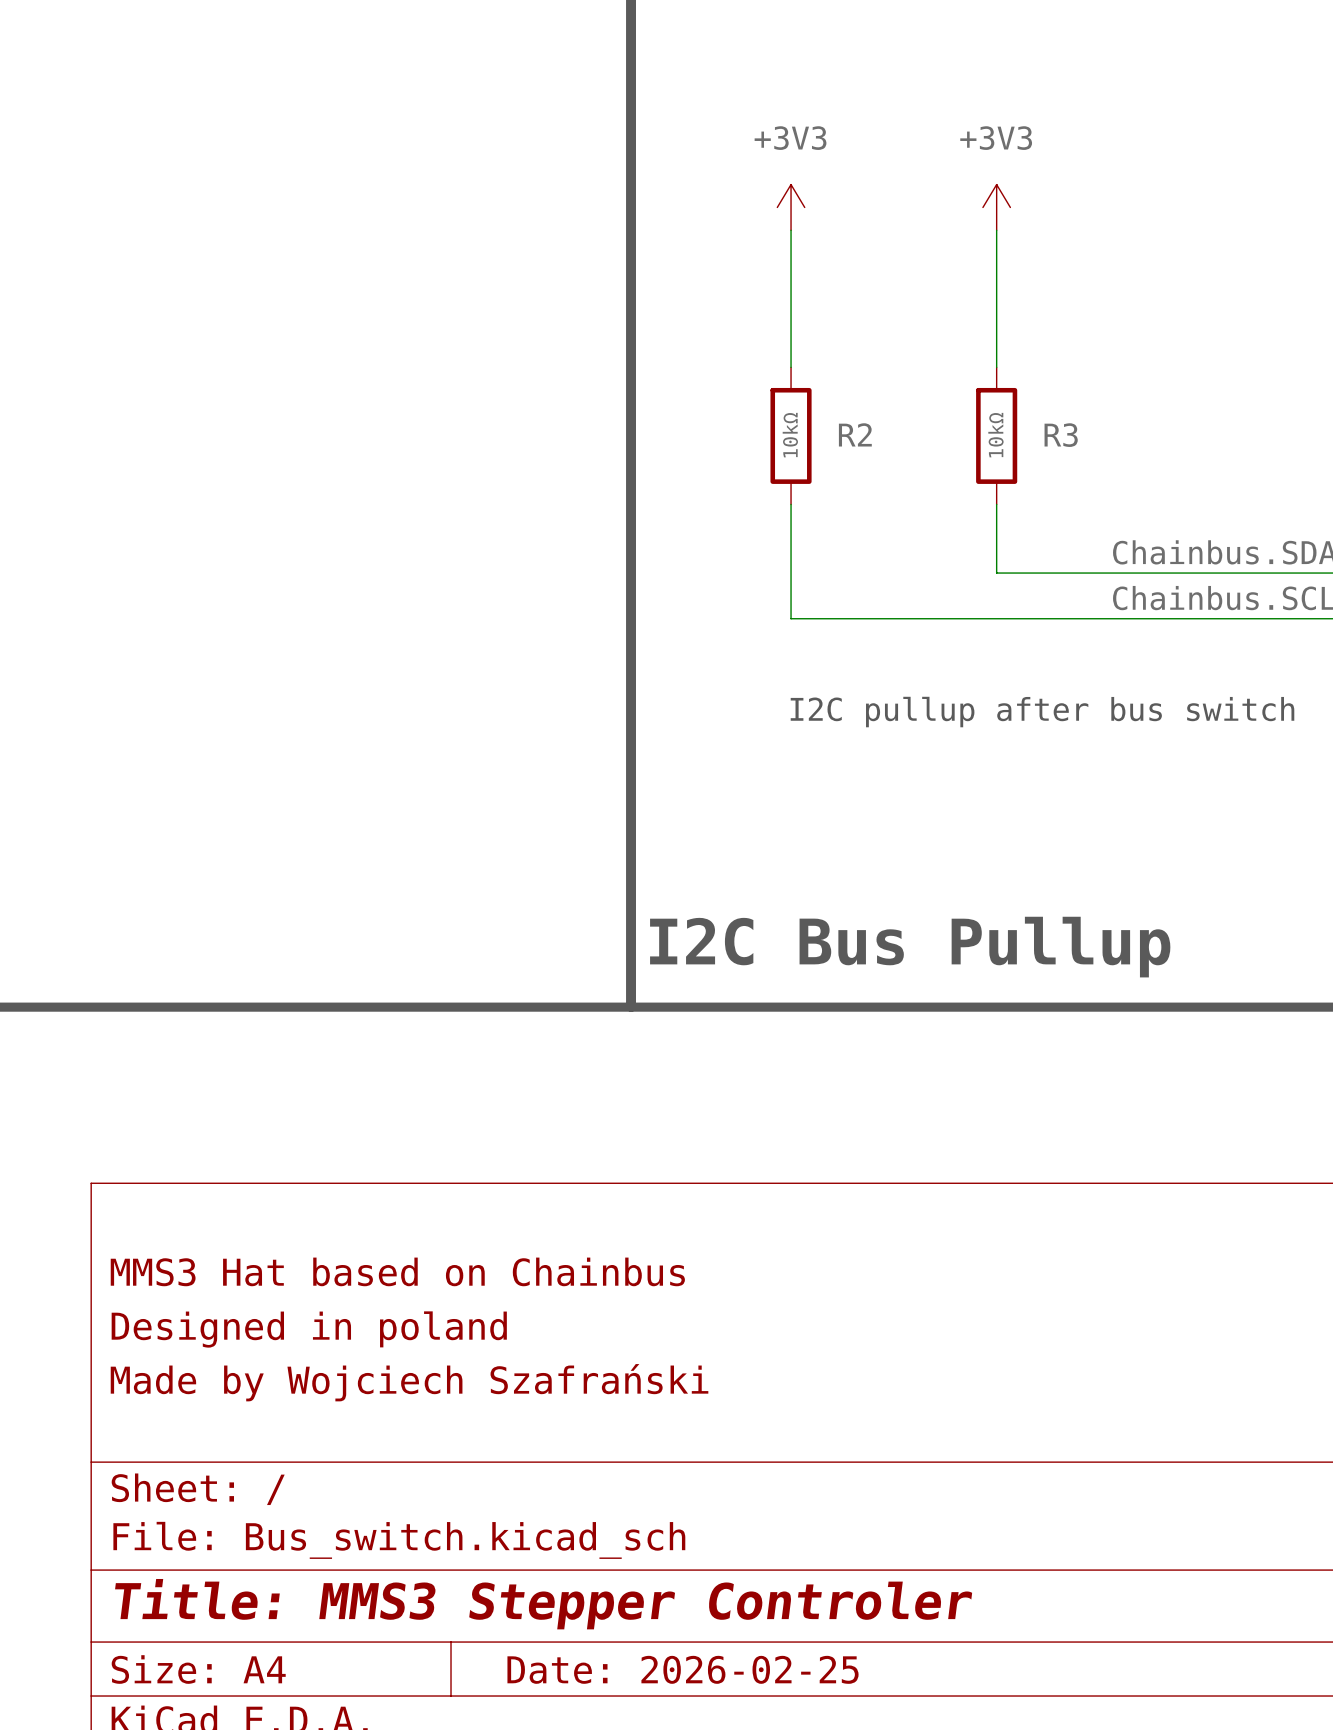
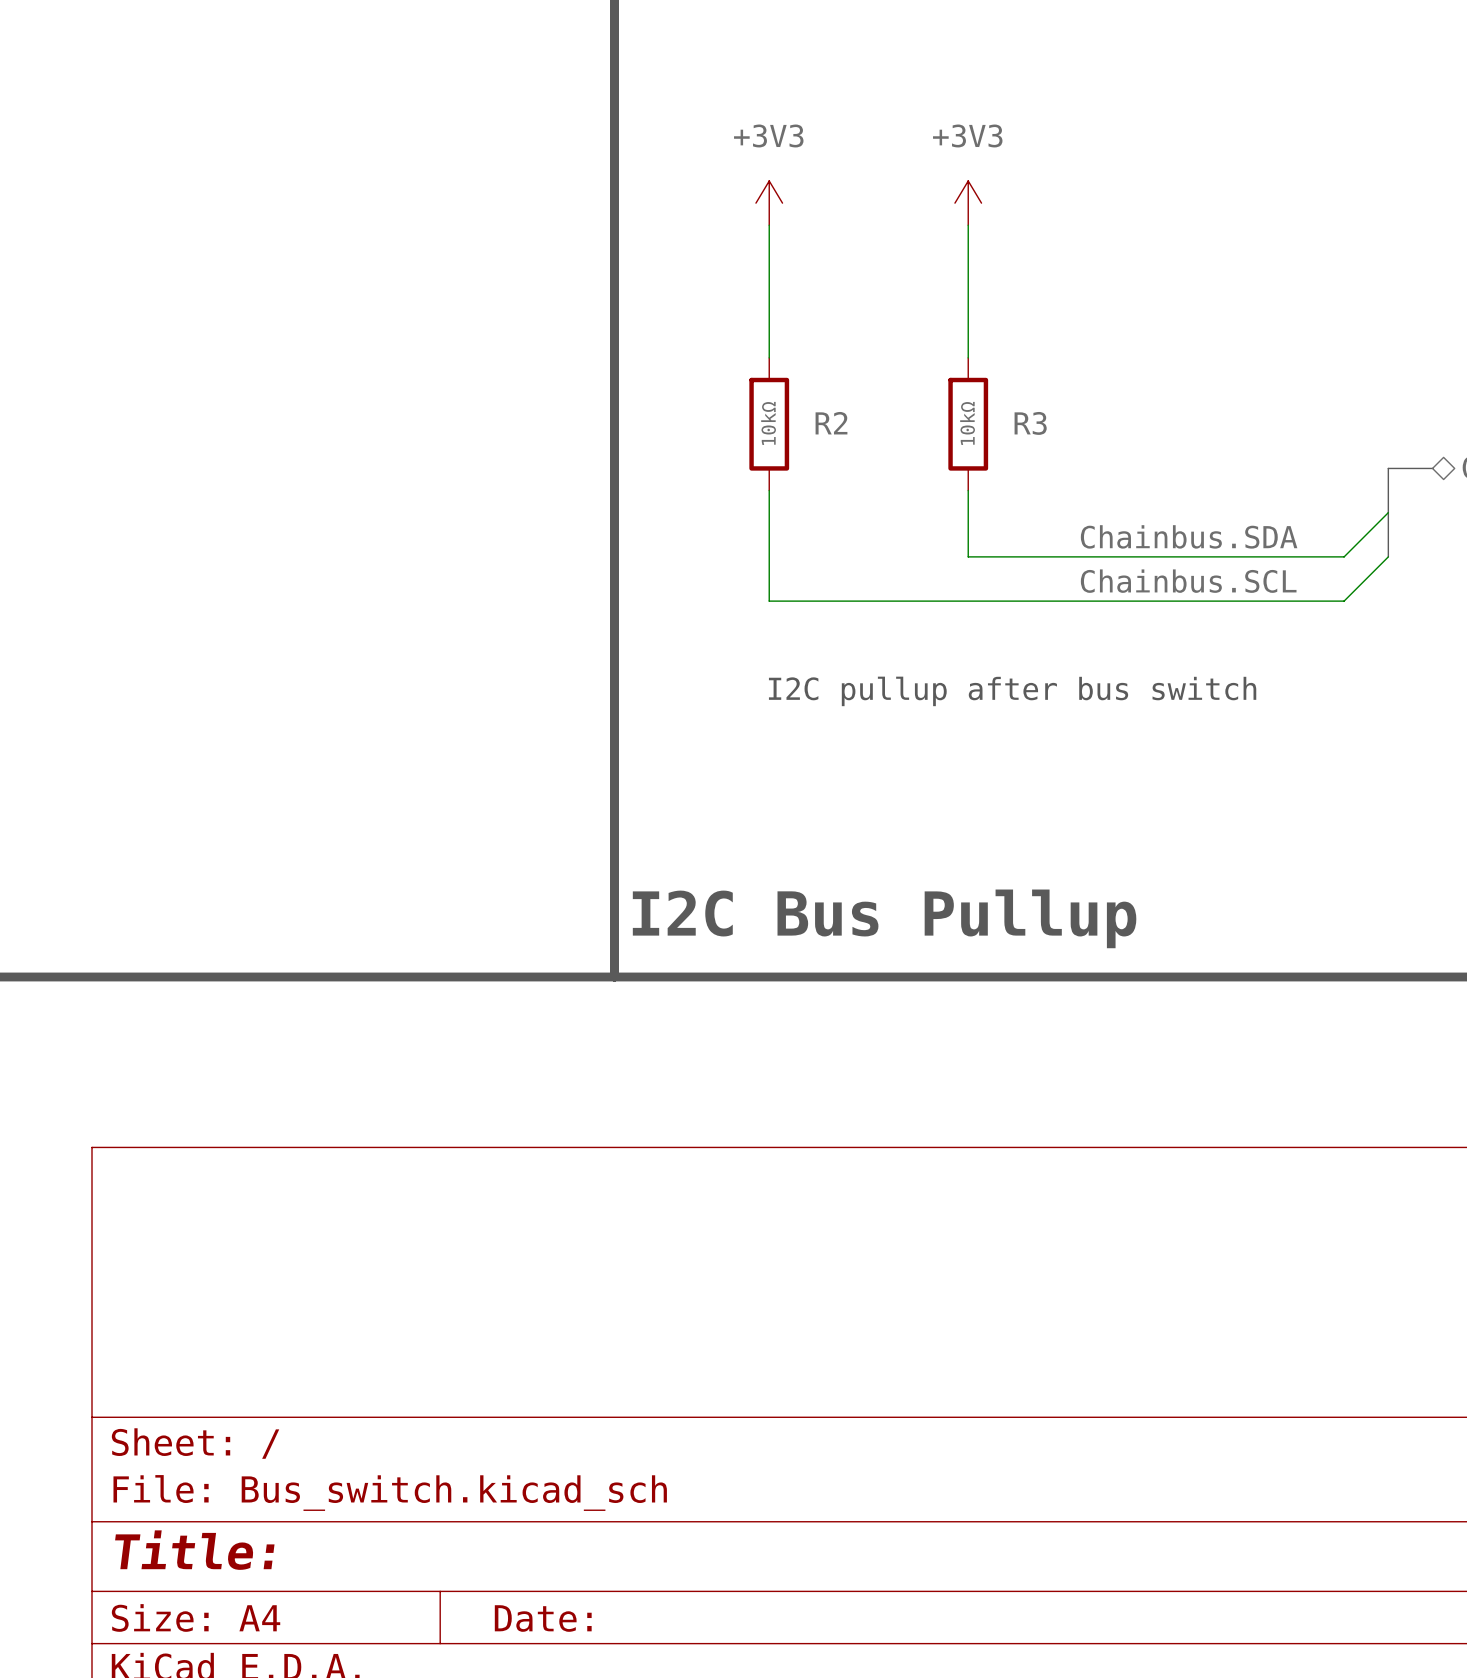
title block: MMS3 Hat based on Chainbus (397, 1271) -> none
title block: Designed in poland (309, 1329) -> none
title block: Made by Wojciech Szafrański (409, 1382) -> none
title block: Title: MMS3 Stepper Controler (543, 1604) -> Title: (194, 1550)
title block: Date: 2026-02-25 (683, 1669) -> Date: (543, 1618)

